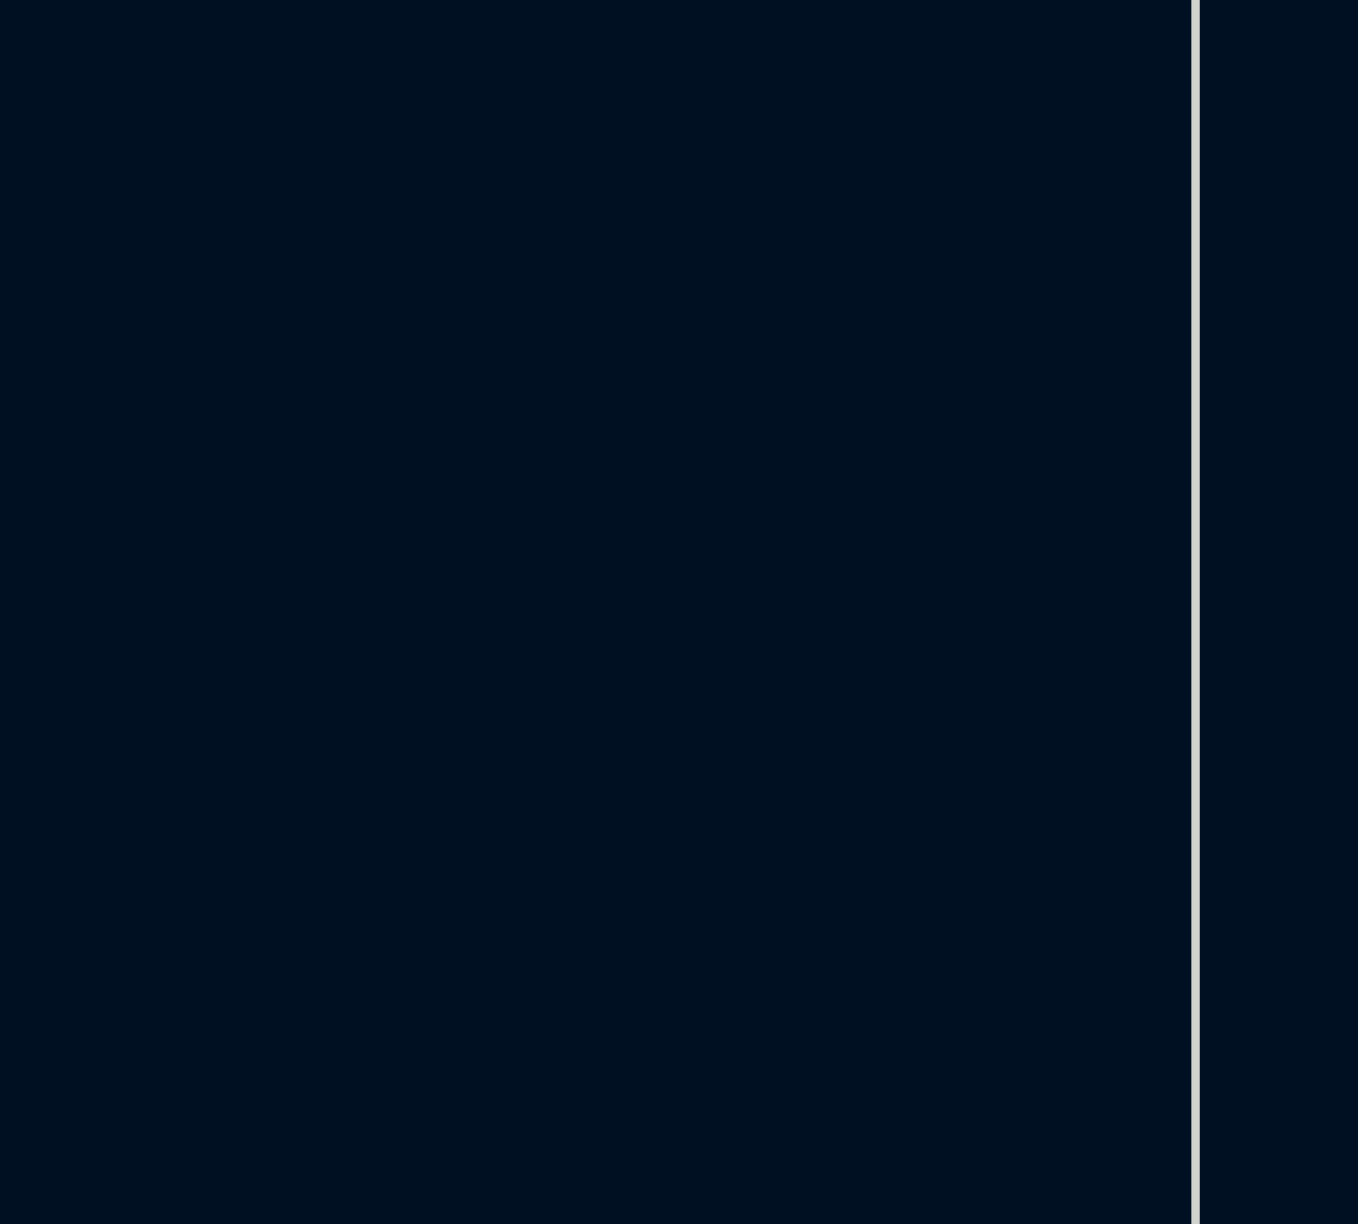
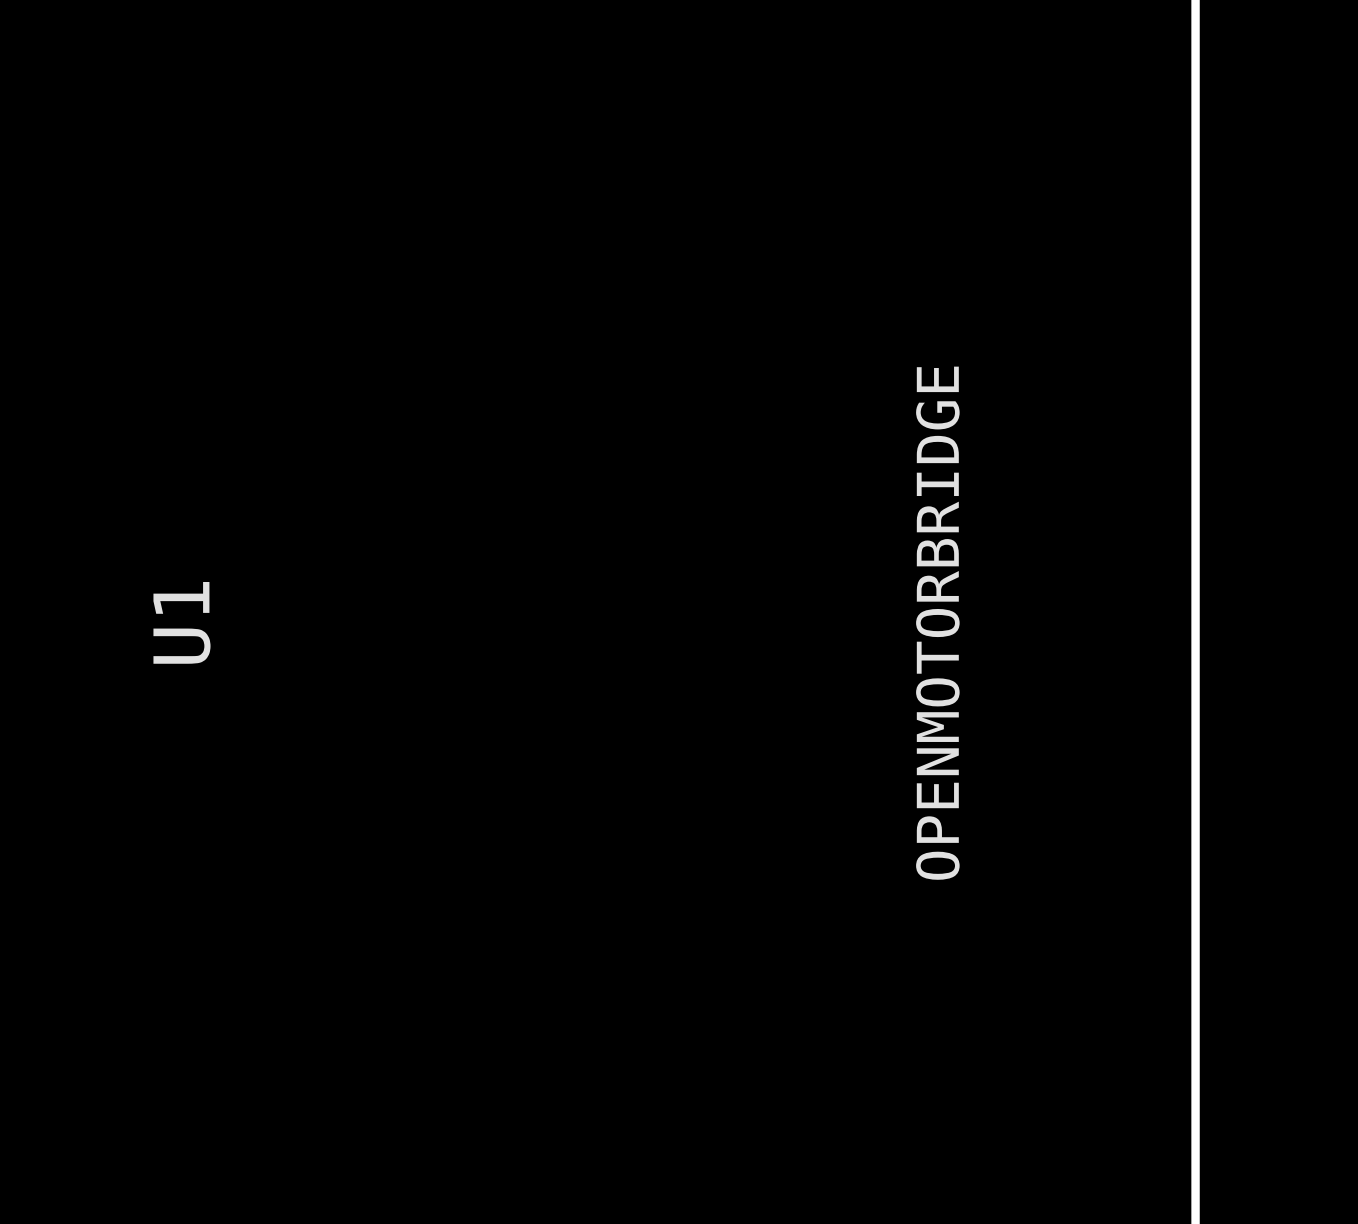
U1: none -> (182, 622)
text: none -> OPENMOTORBRIDGE (937, 623)

